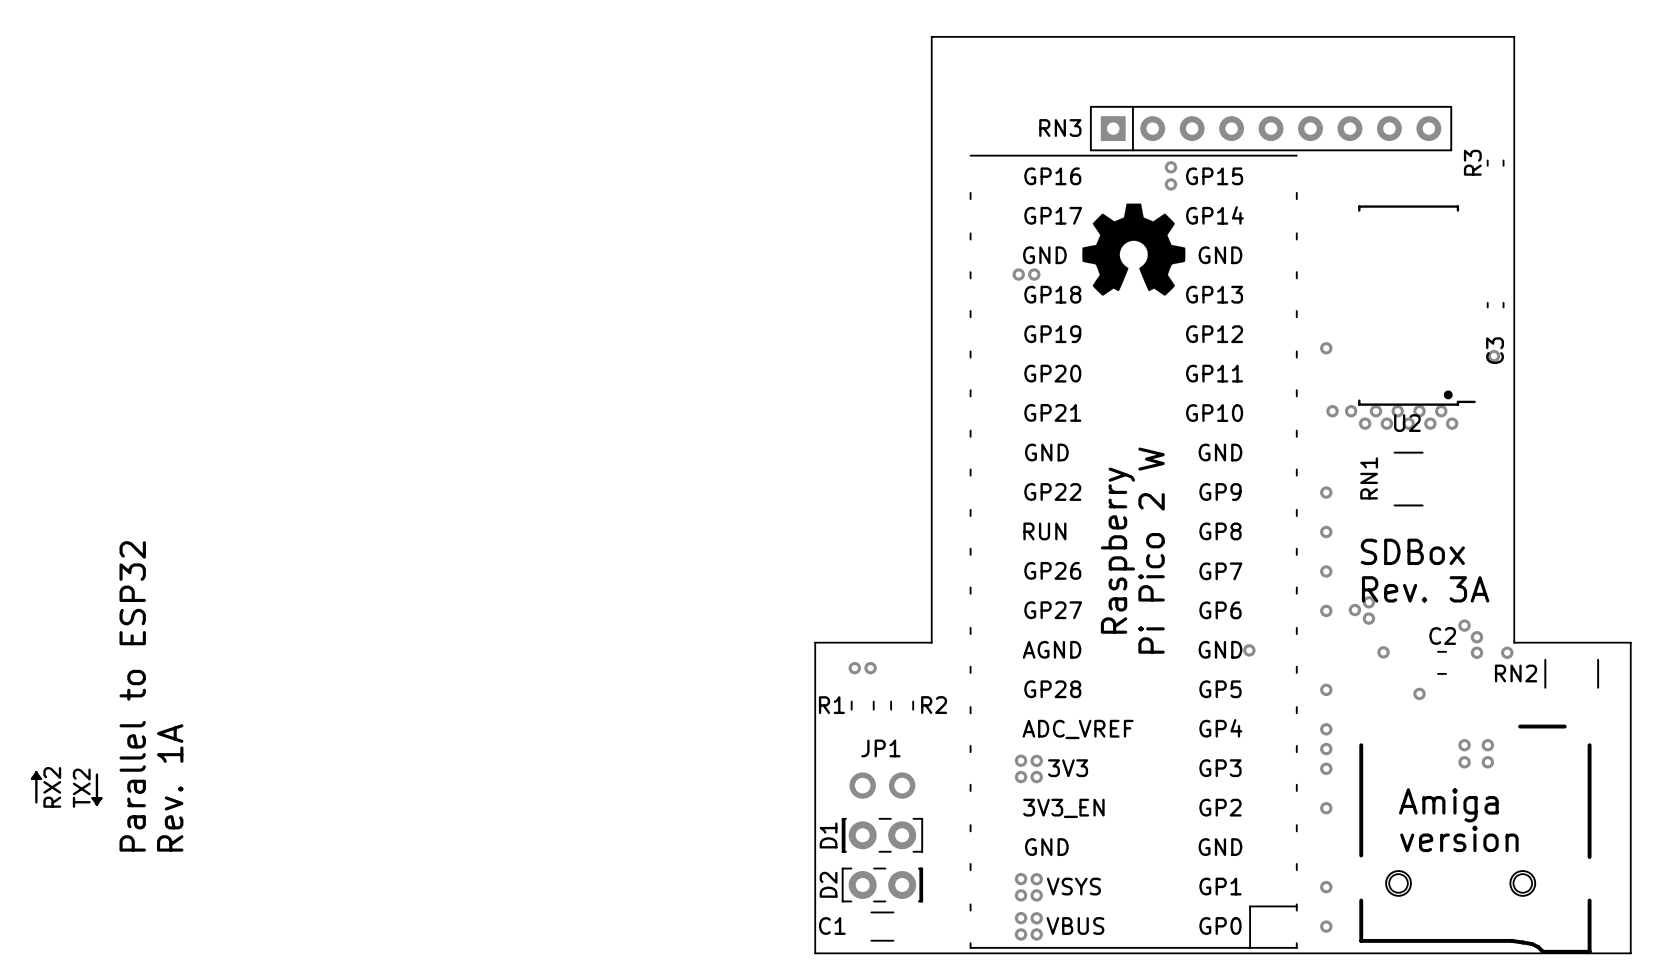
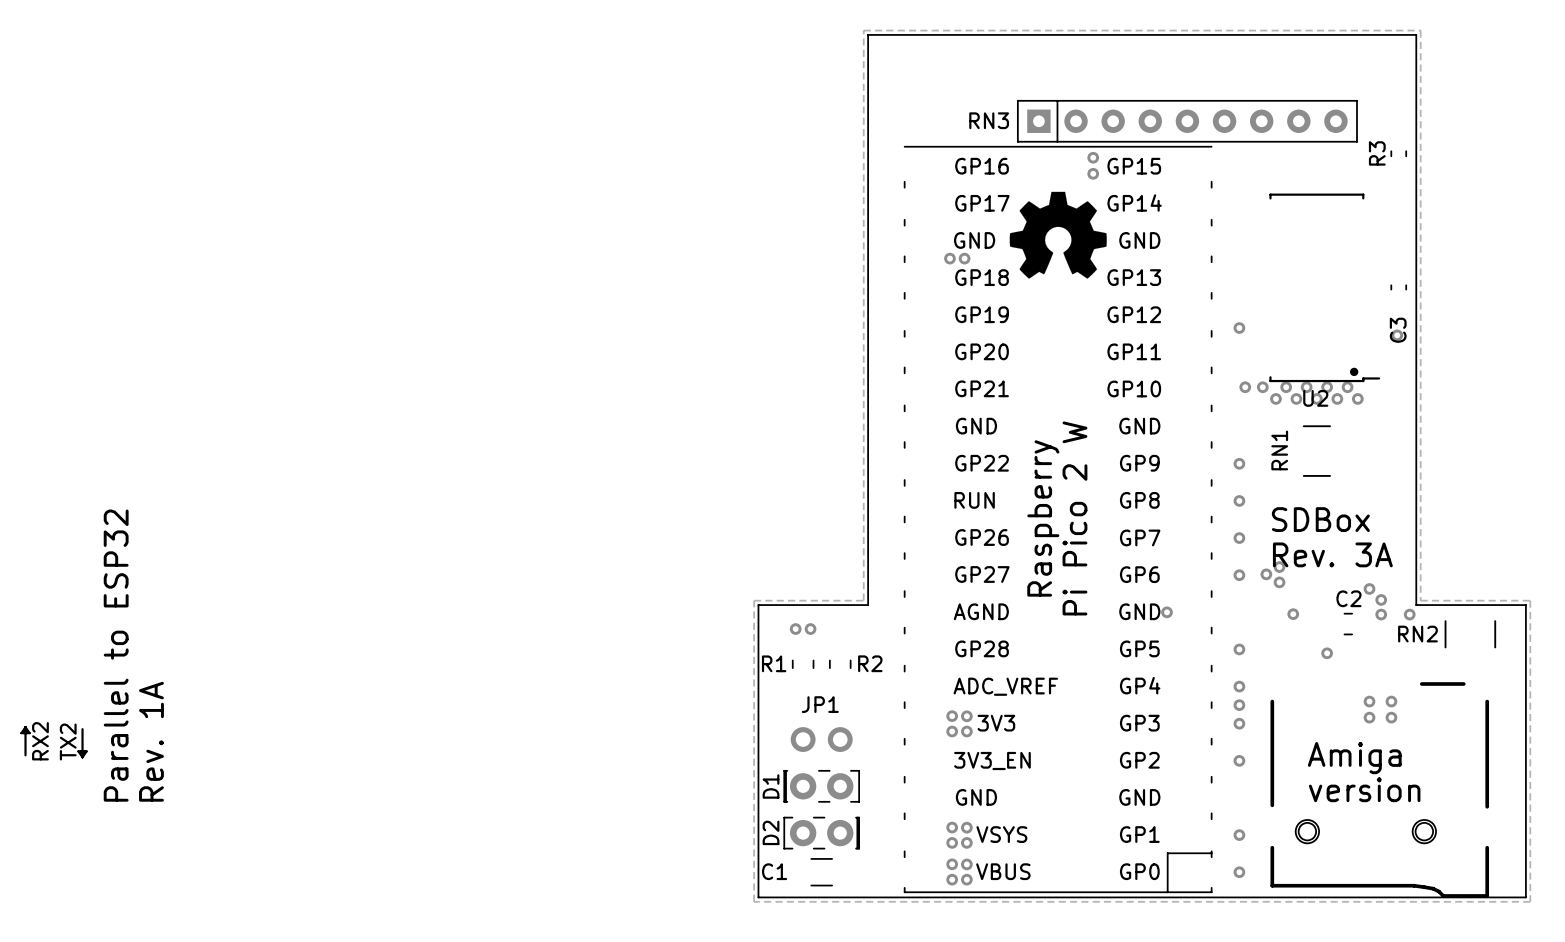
zone outline: none -> (863, 30) (863, 600) (754, 600) (754, 901) (1530, 901) (1530, 600) (1420, 600) (1420, 30) (863, 30)

